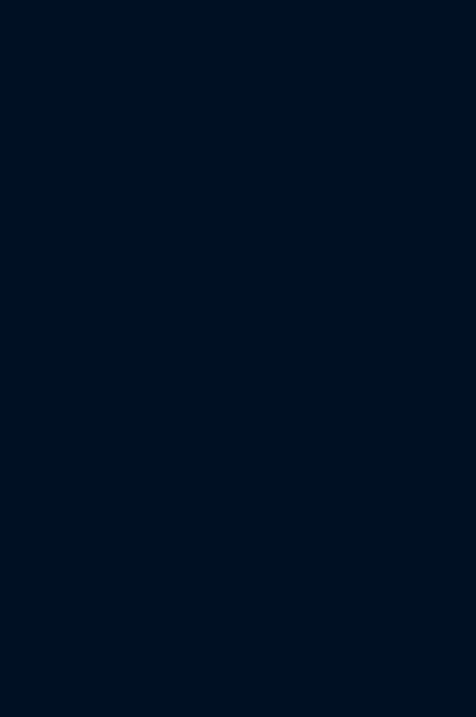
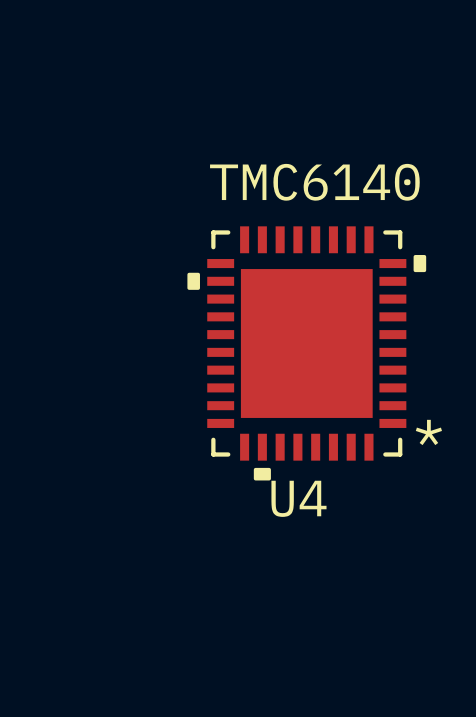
U4: none -> TMC6140 (306, 353)

